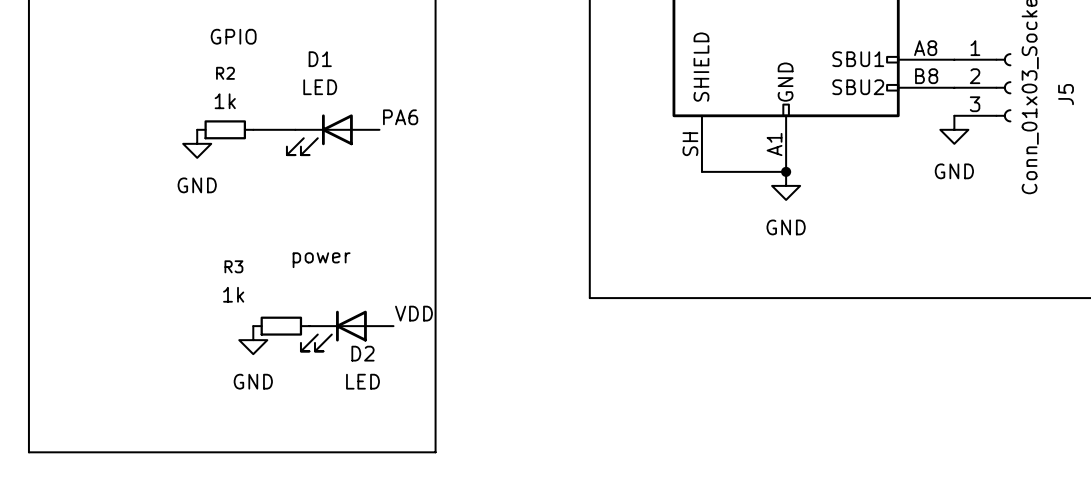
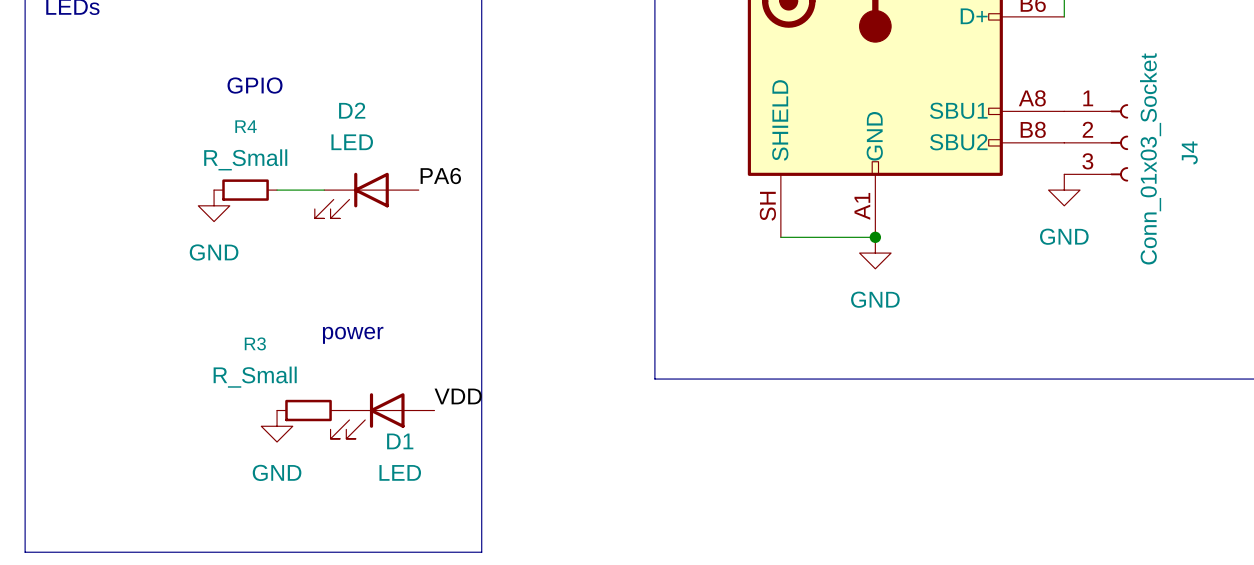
D1 name: D1 (320, 59) -> D2 (352, 110)
R2 name: R2 (225, 73) -> R4 (246, 126)
J5 name: J5 (1066, 94) -> J4 (1189, 152)
R2 value: 1k (225, 101) -> R_Small (245, 159)
R3 value: 1k (233, 294) -> R_Small (255, 377)
D2 name: D2 (362, 353) -> D1 (400, 441)

